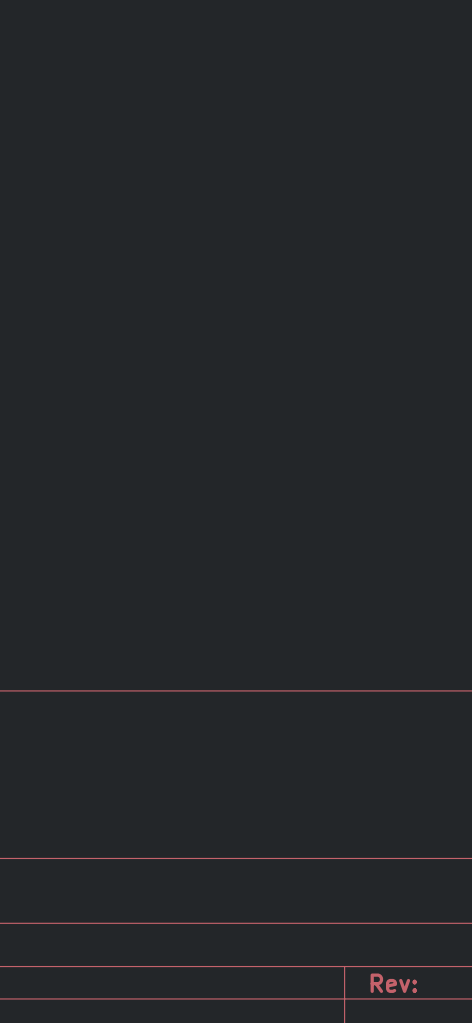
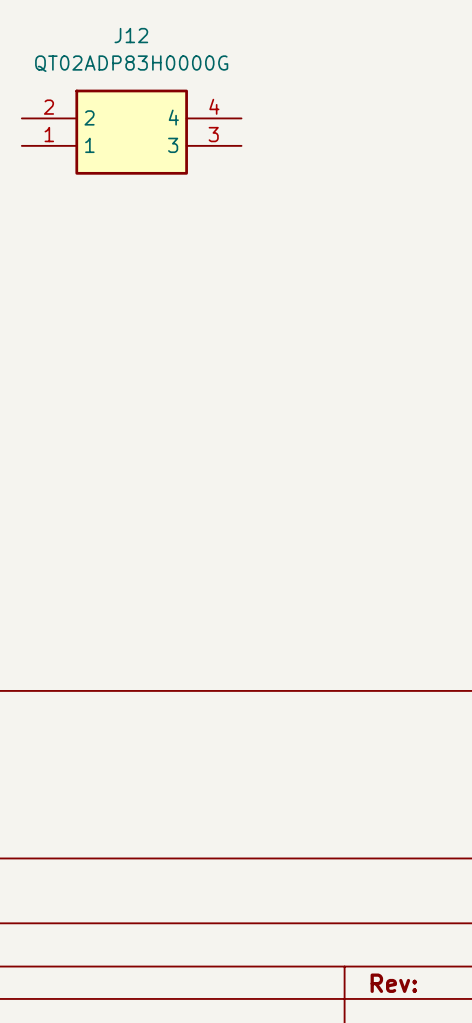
J12: none -> QT02ADP83H0000G (131, 132)

